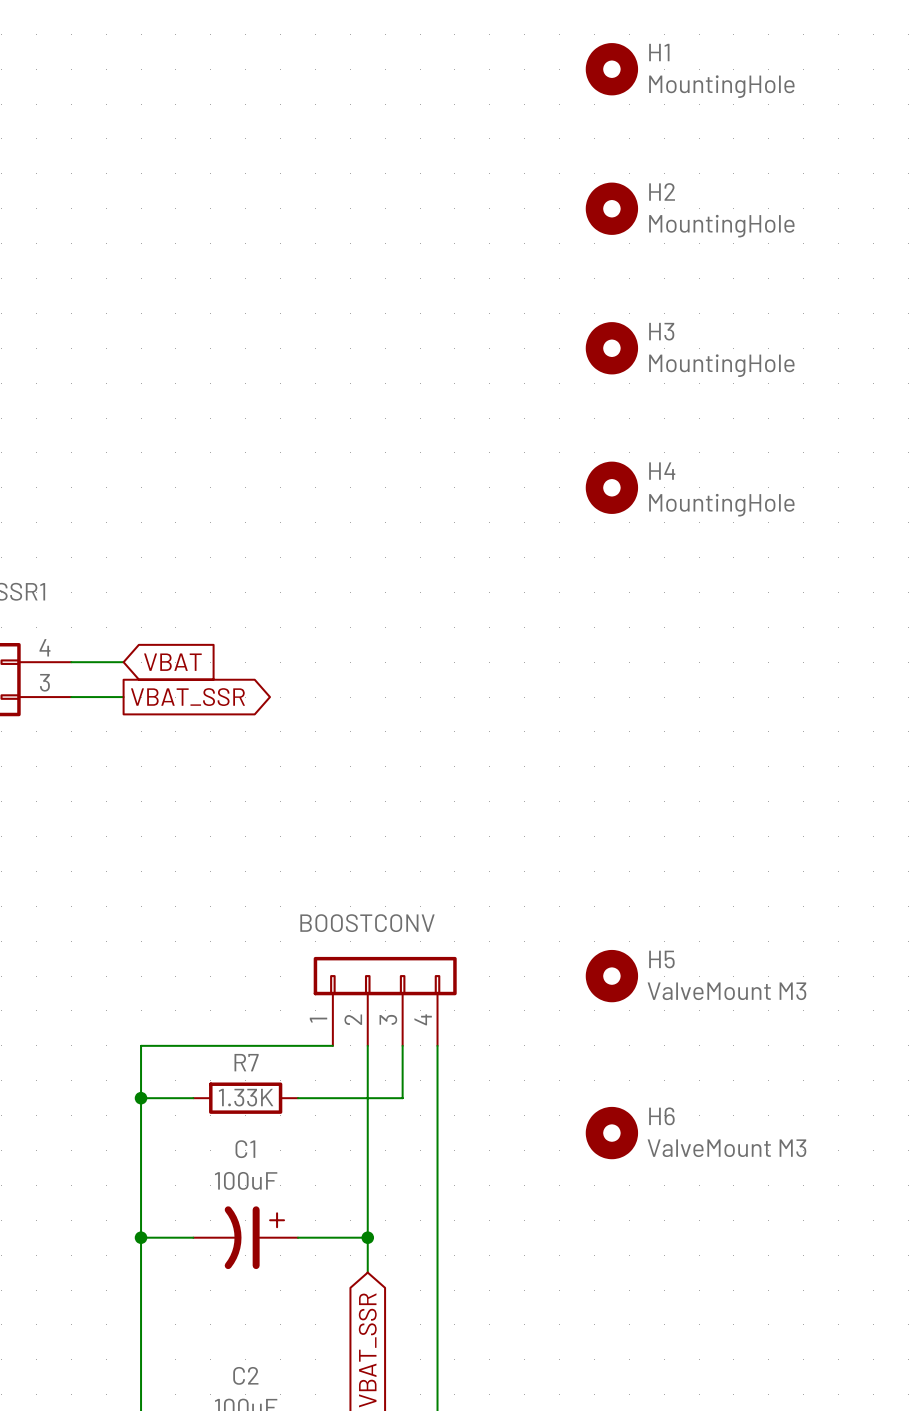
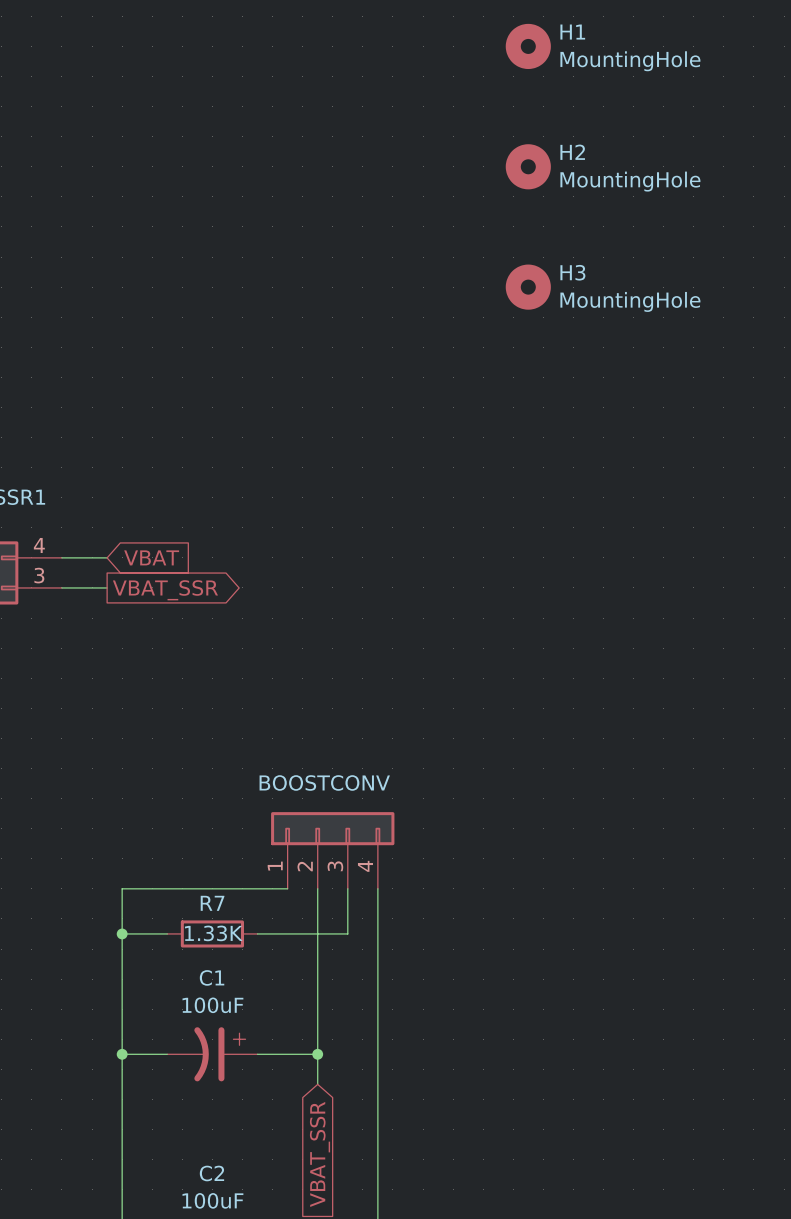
H4: MountingHole (611, 487) -> none
H5: ValveMount M3 (611, 976) -> none
H6: ValveMount M3 (611, 1133) -> none

